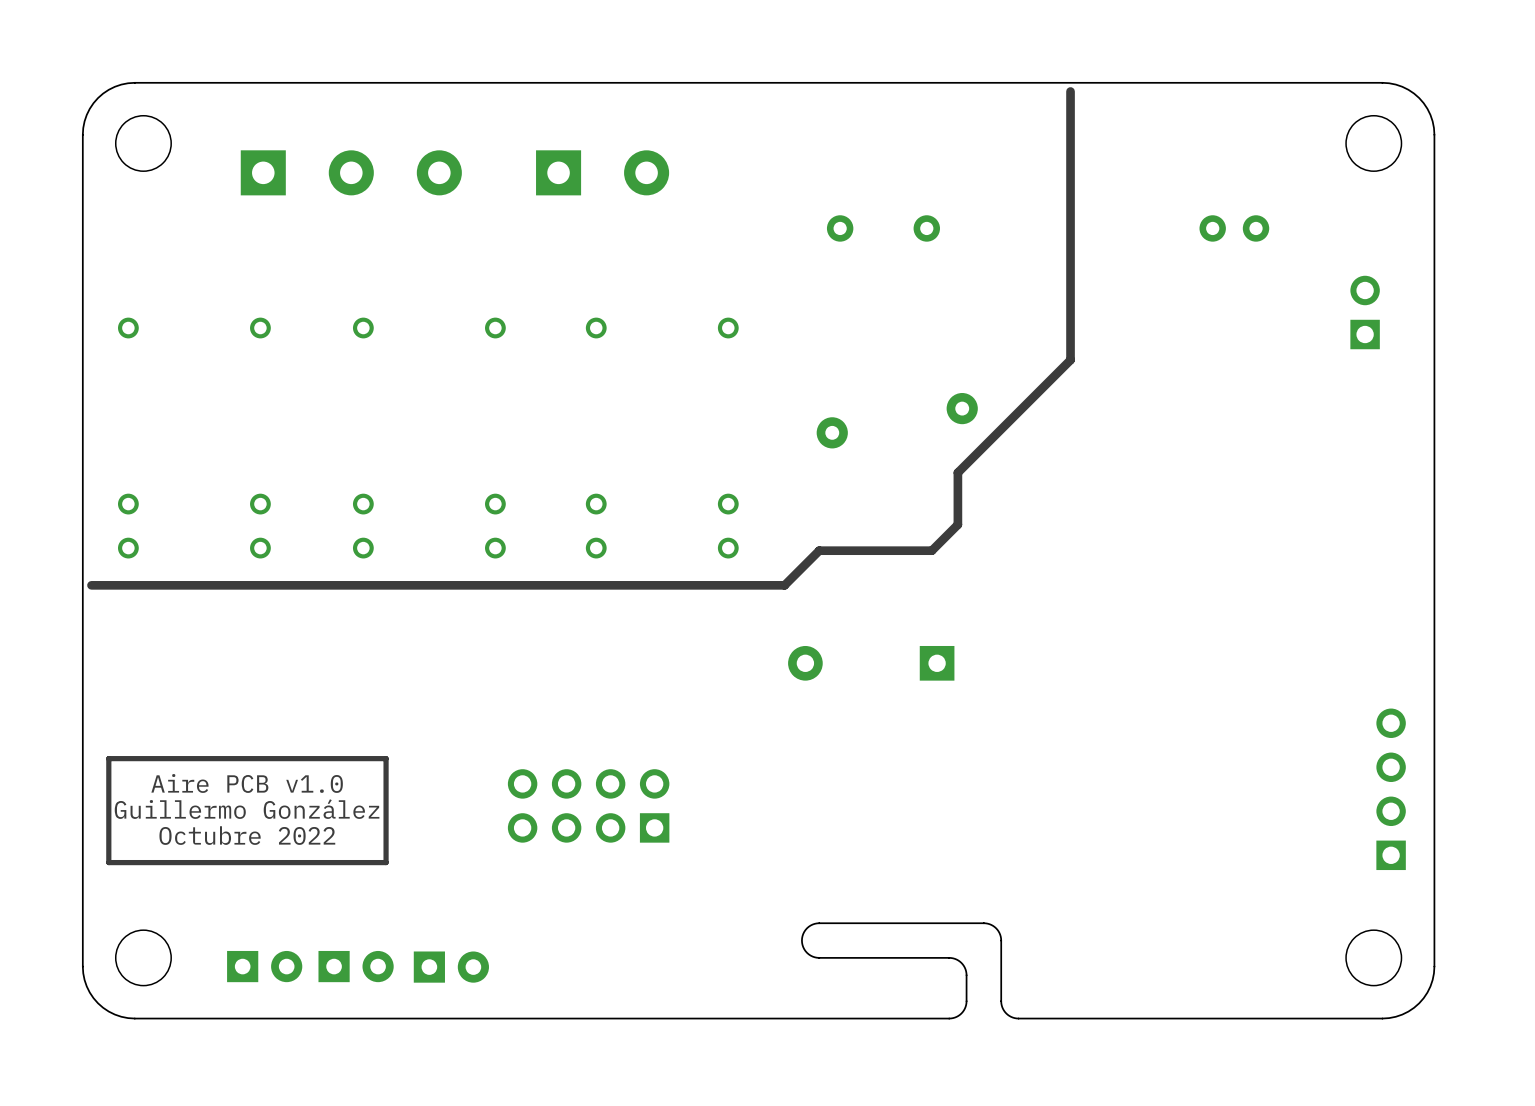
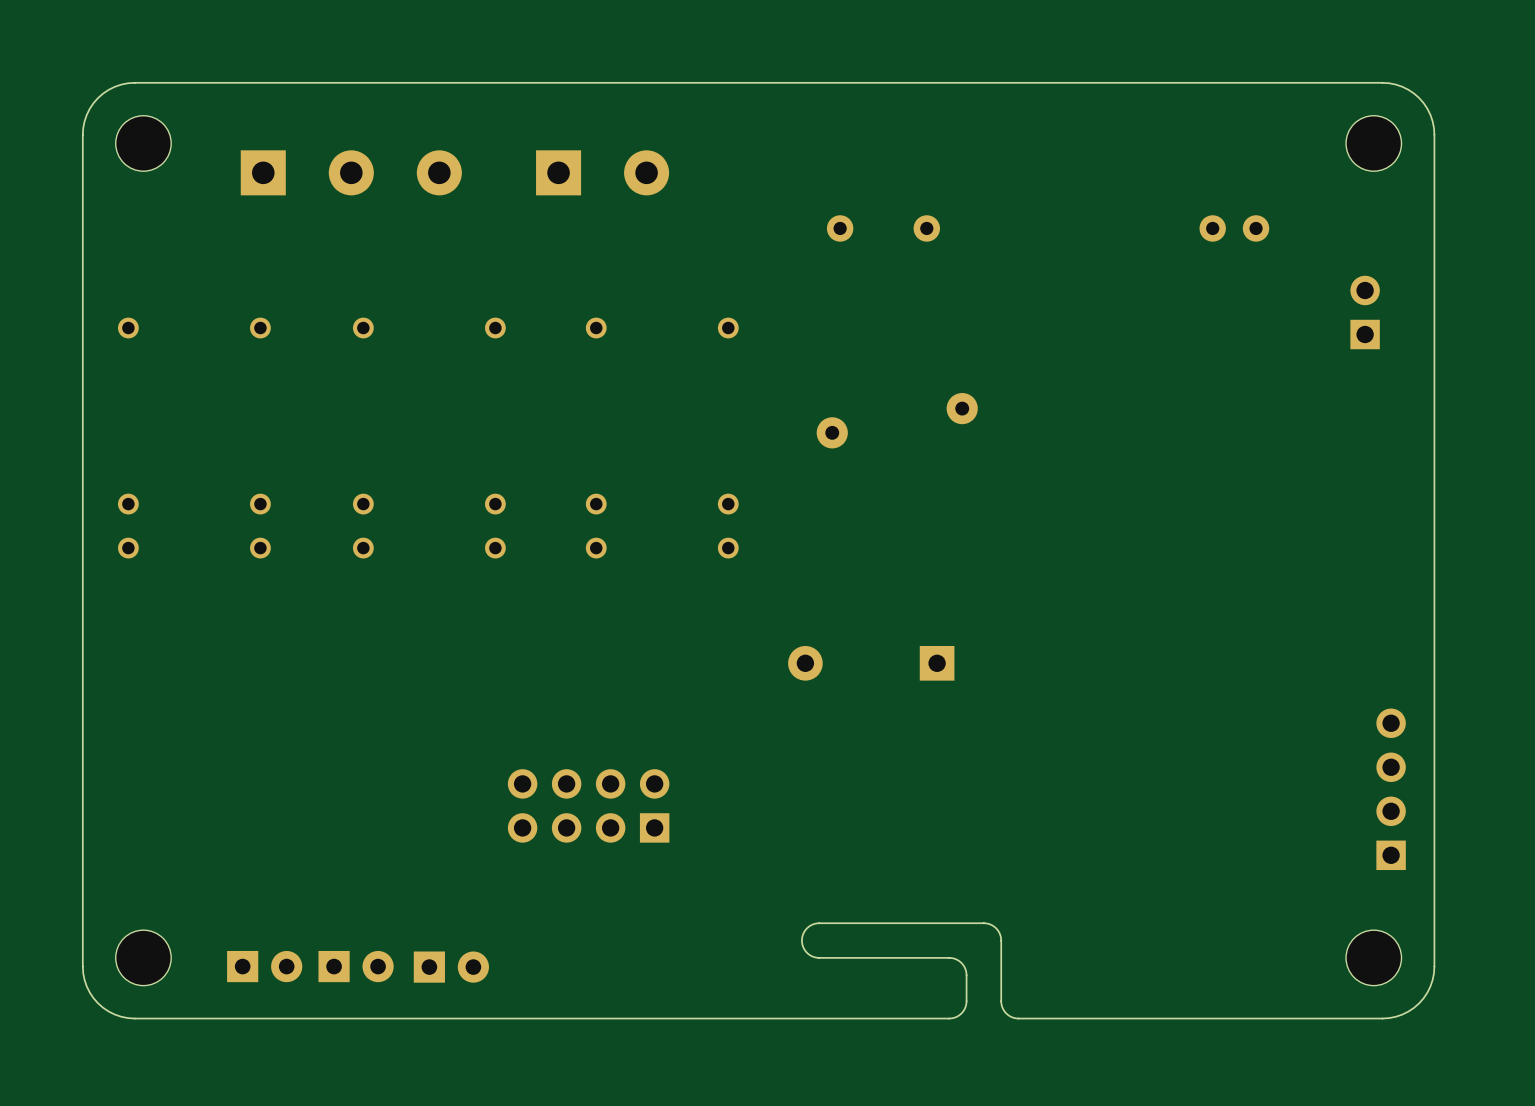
line: (1070, 91) (1070, 360) (957, 472) (957, 524) (931, 550) (819, 550) (784, 585) (91, 585) -> none
line: (386, 758) (108, 758) (108, 862) (386, 862) (386, 758) -> none
text: Aire PCB v1.0 (247, 783) -> none
text: Guillermo González (247, 809) -> none
text: Octubre 2022 (247, 835) -> none

